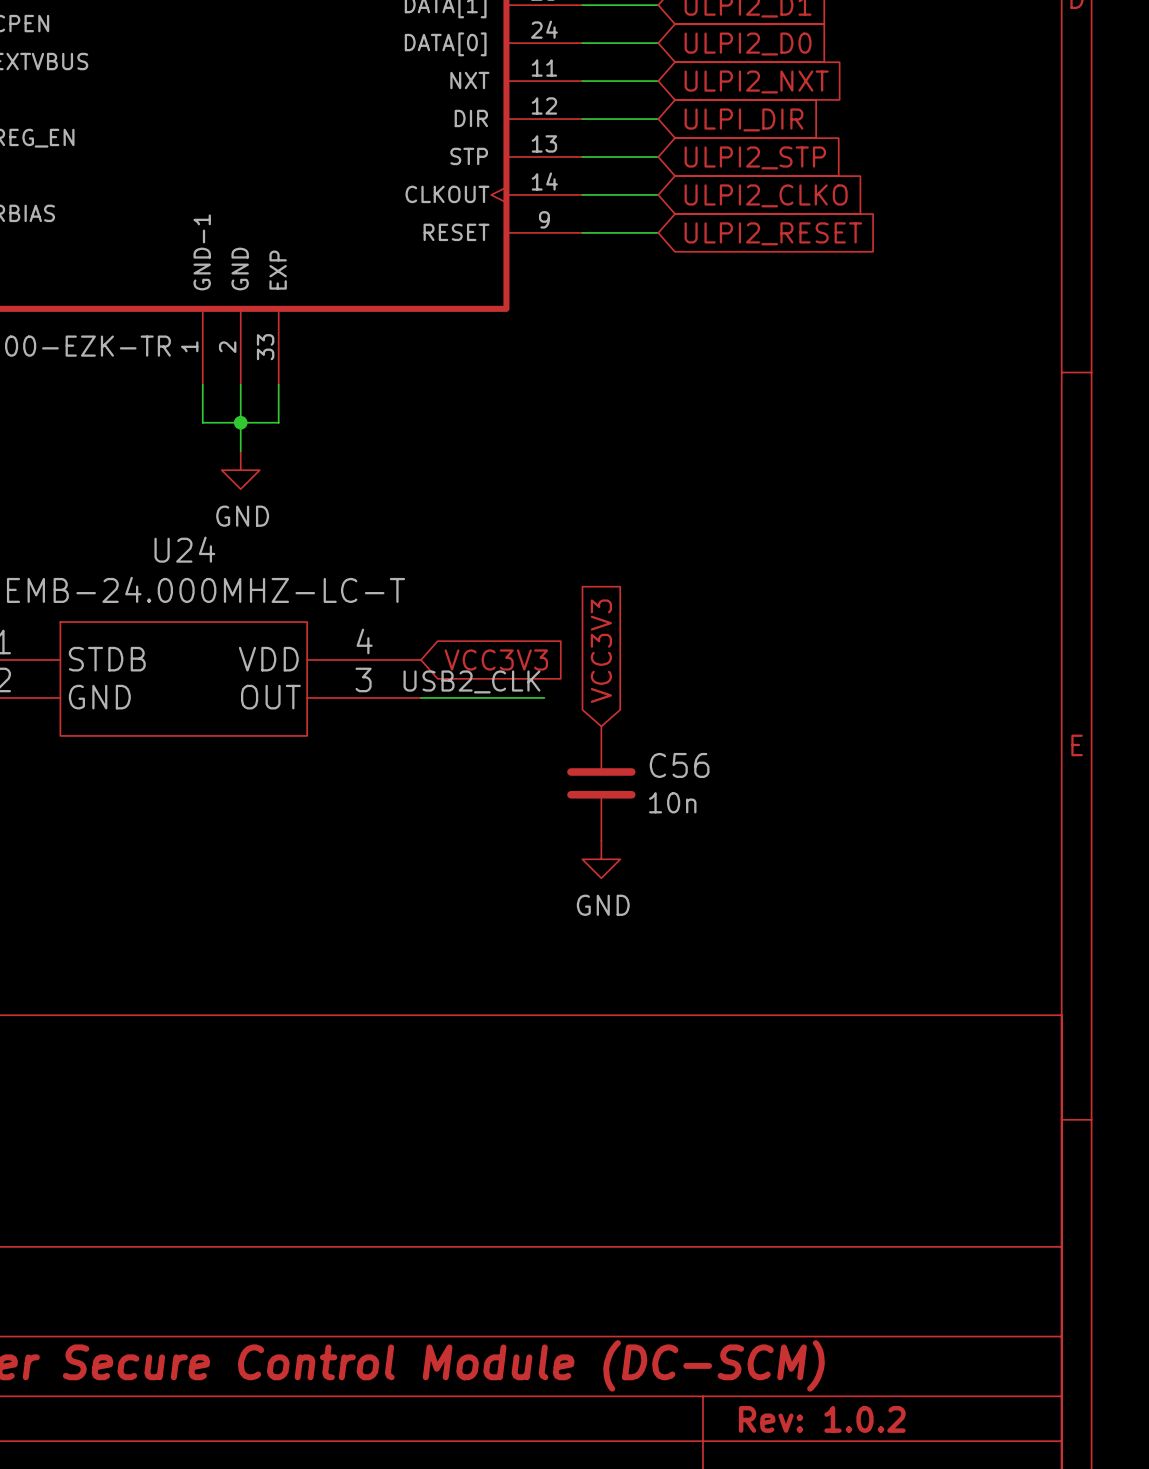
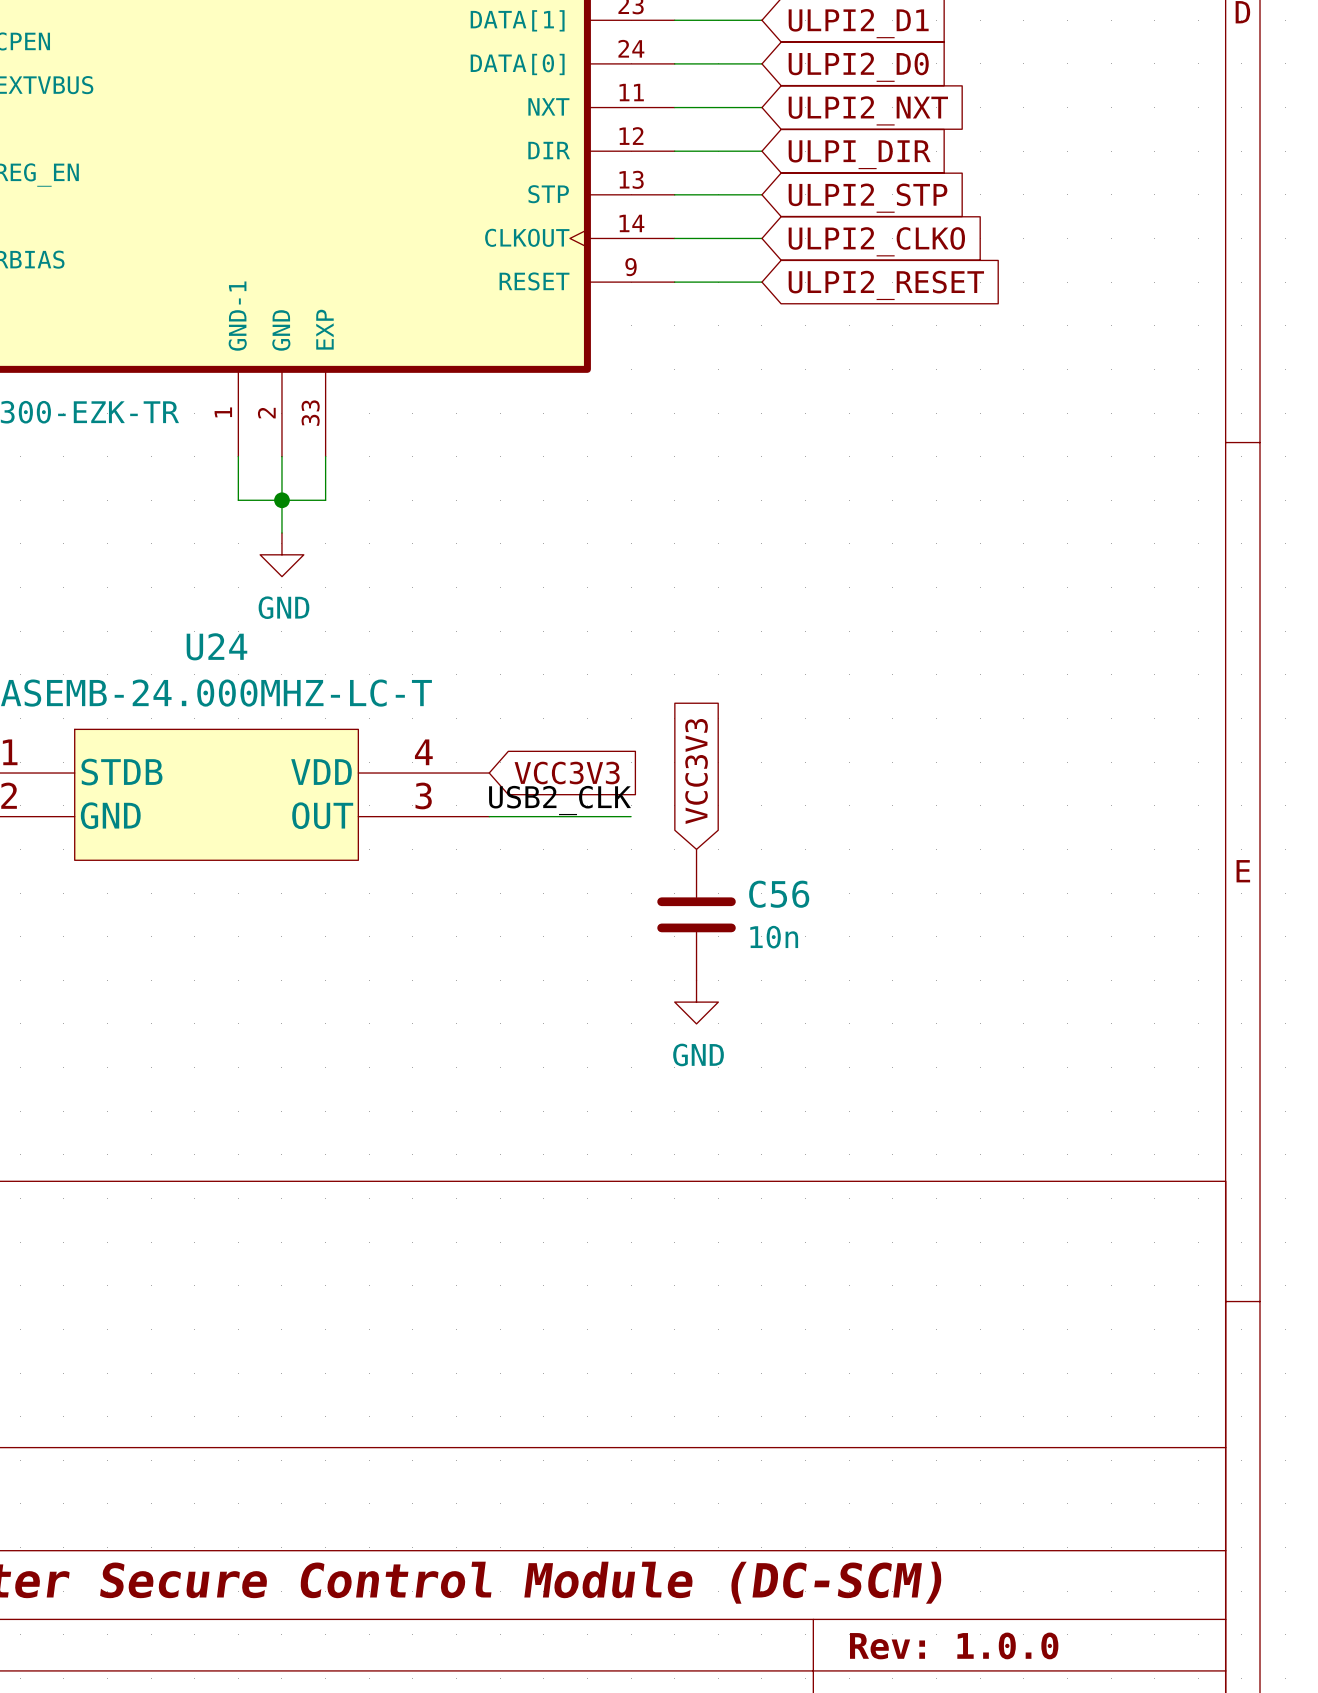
title block: Rev: 1.0.2 (822, 1419) -> Rev: 1.0.0 (954, 1645)

